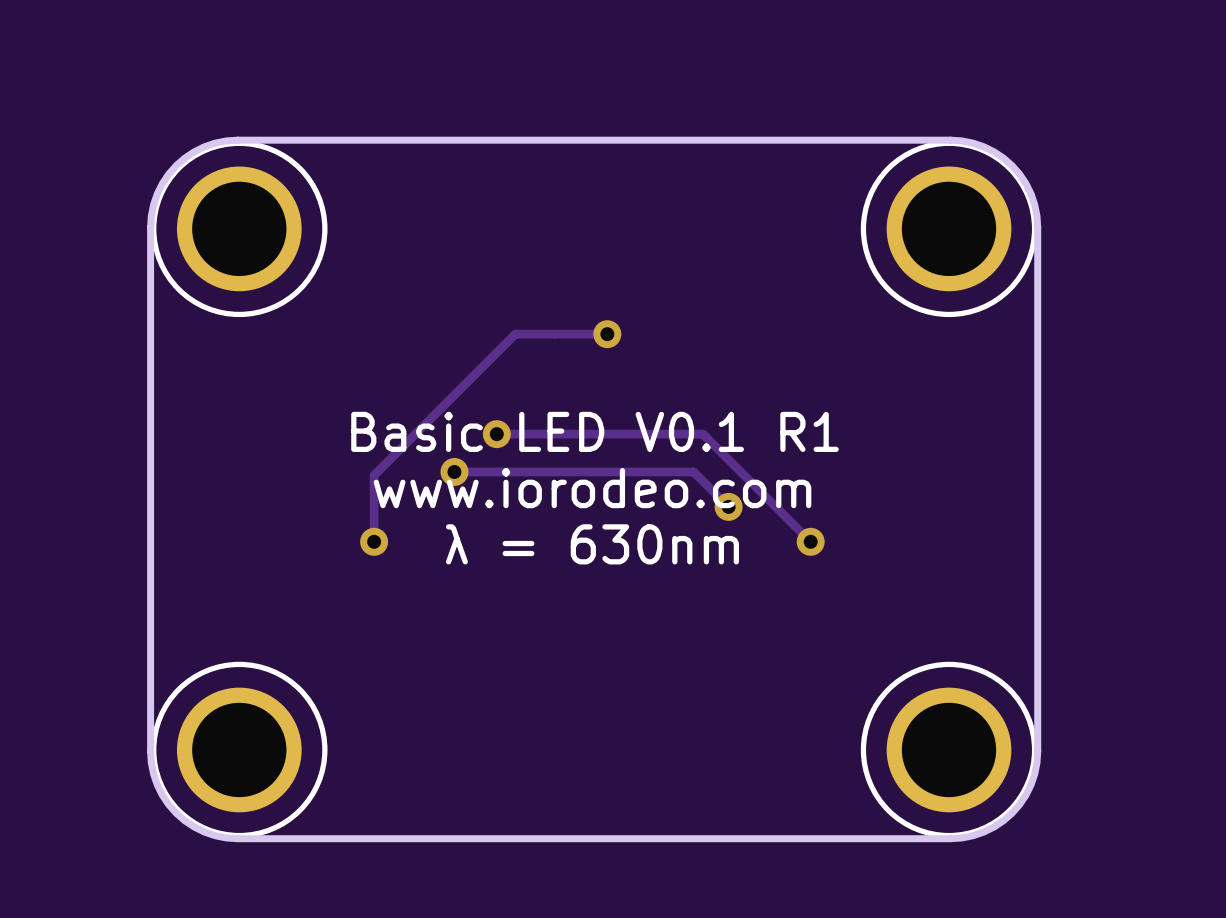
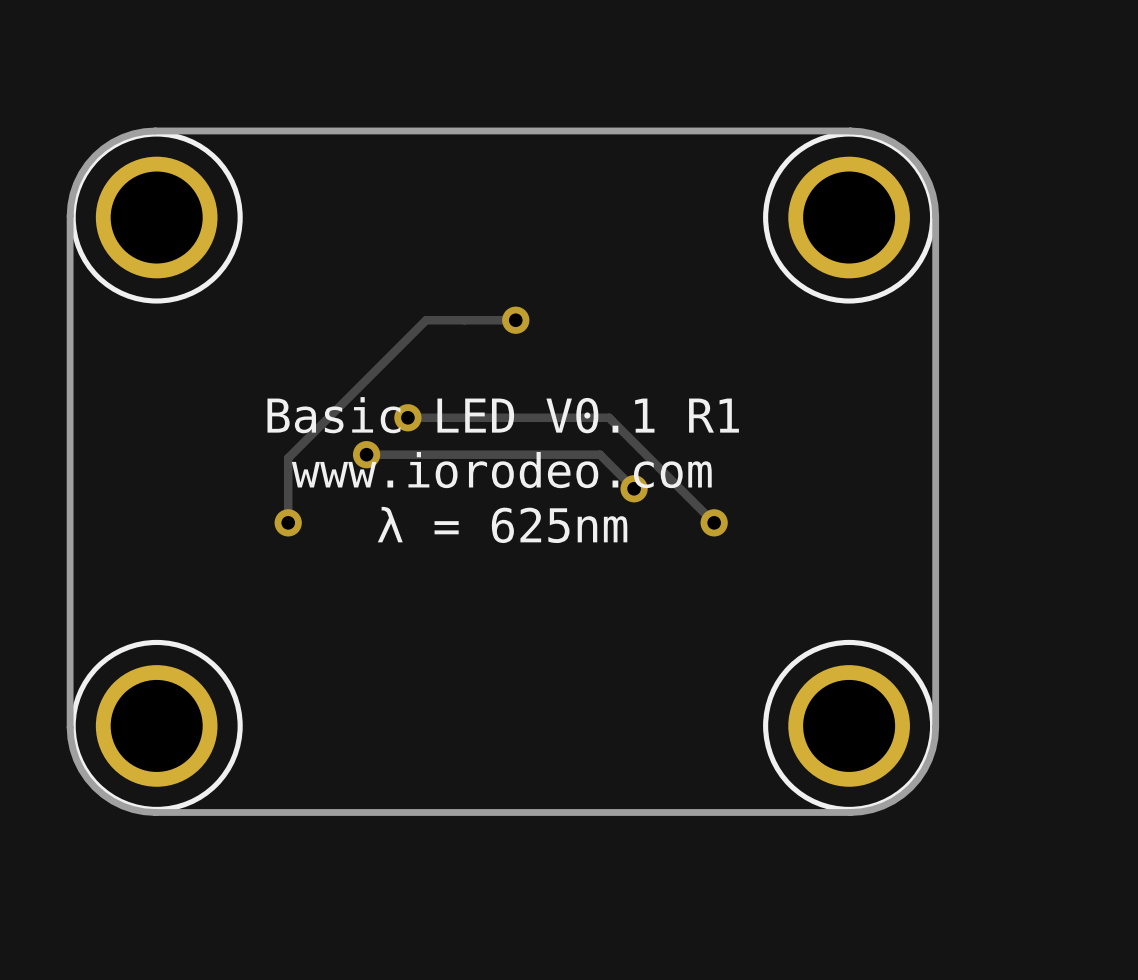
text: λ = 630nm (592, 544) -> λ = 625nm (502, 524)

